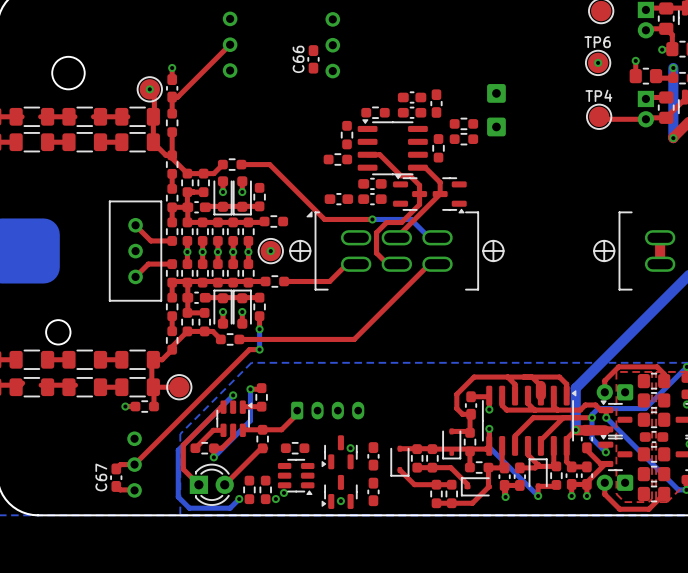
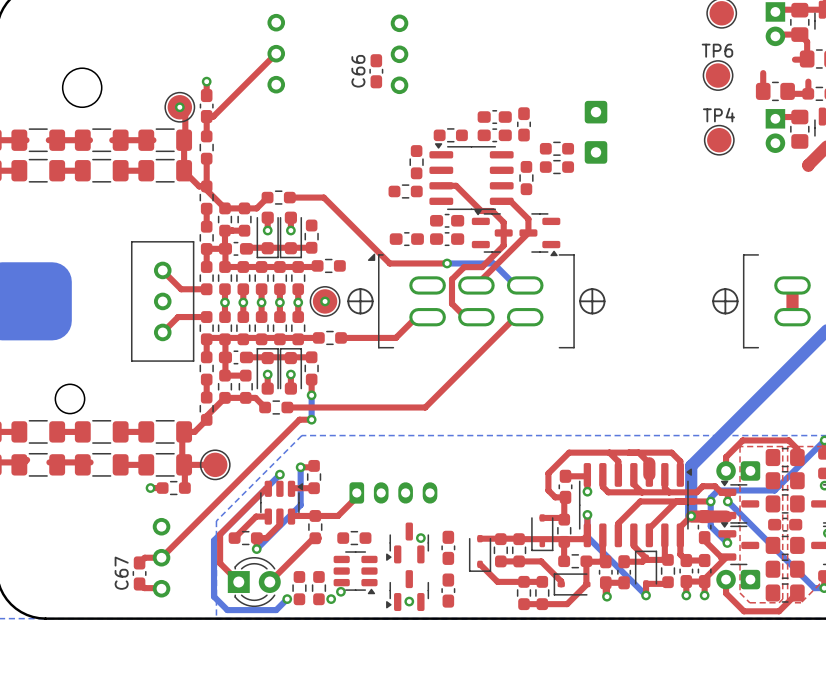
via: (662, 49) -> none
via: (635, 60) -> none
via: (598, 62) -> none
bottom track: (673, 68) (673, 138) -> none
via: (673, 68) -> none
top track: (685, 97) (666, 117) (601, 119) (599, 116) -> none
via: (673, 138) -> none

